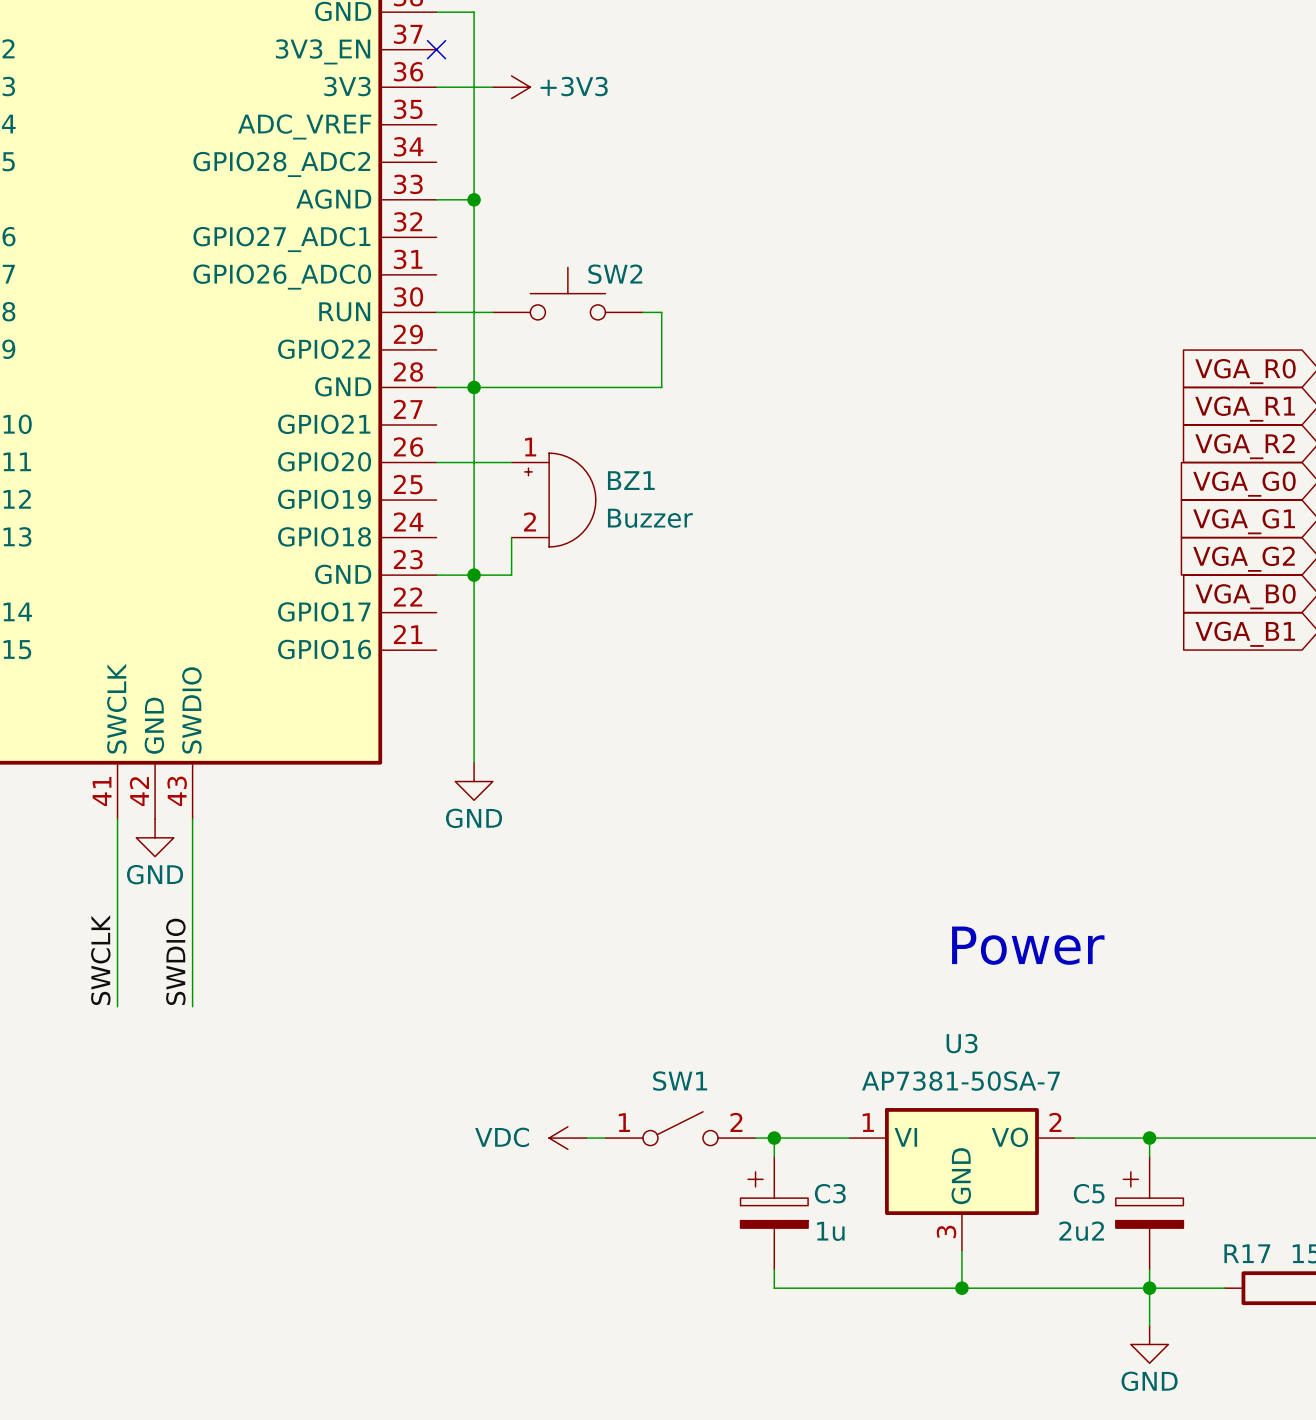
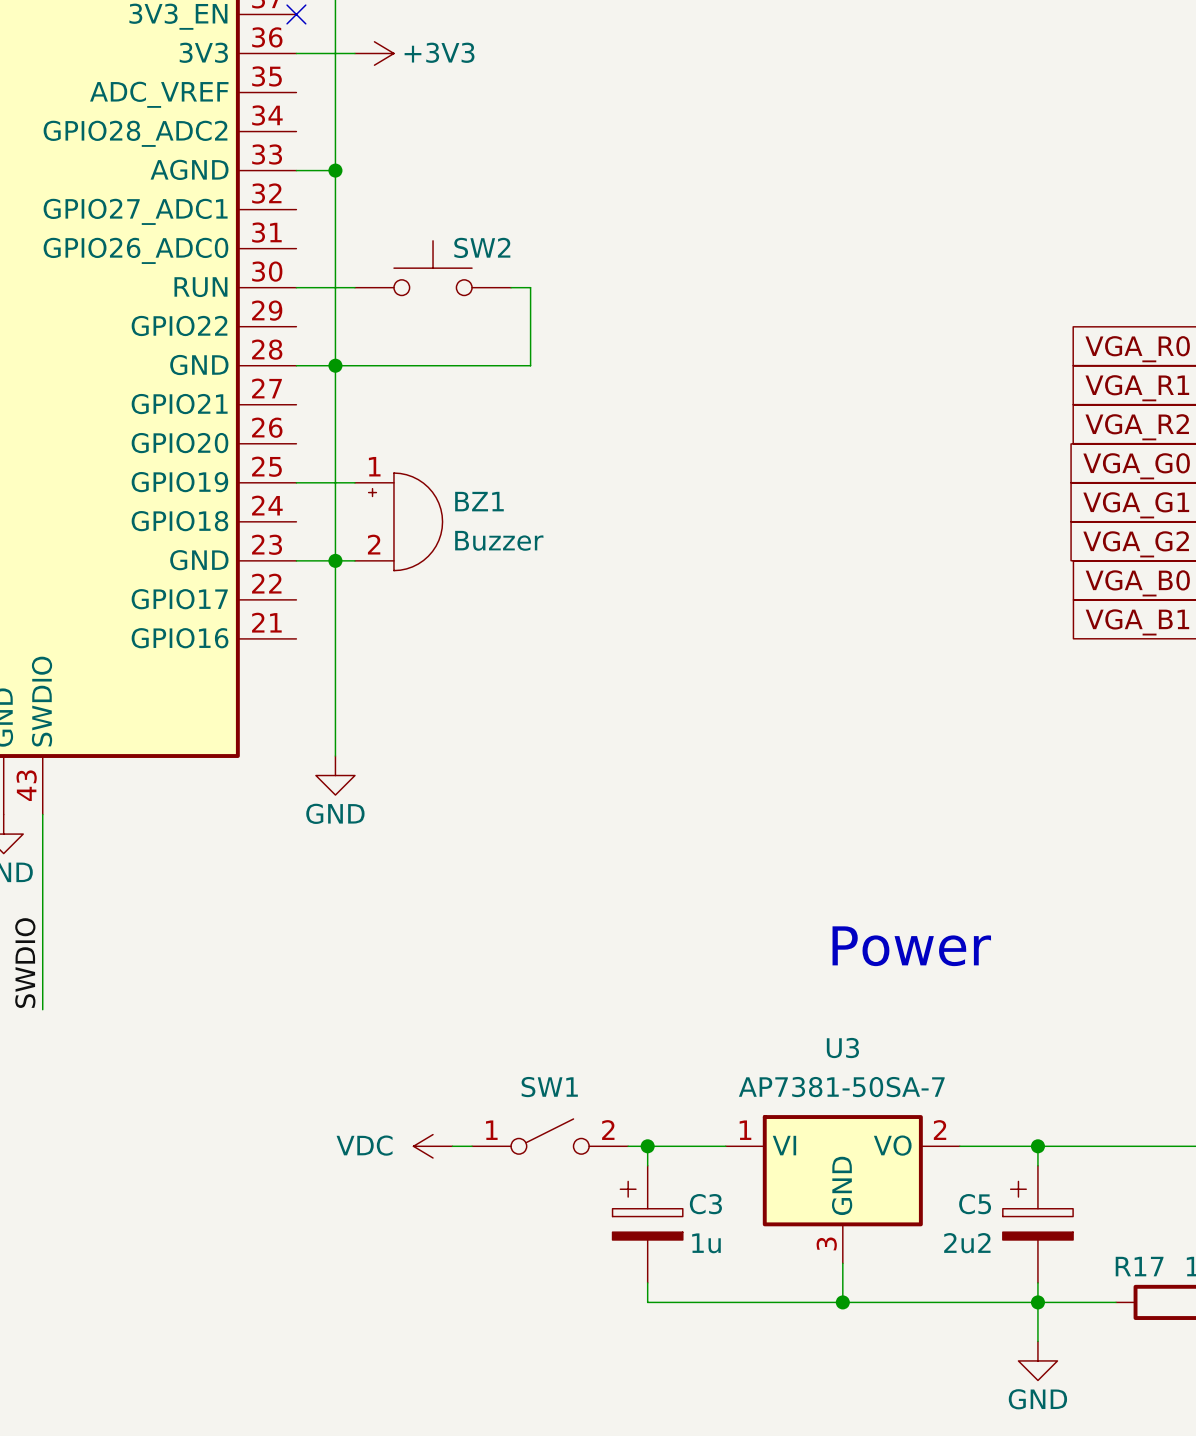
wire: (436, 462) (511, 462) -> none
wire: none -> (296, 482) (354, 482)
BZ1 position: (553, 500) -> (398, 521)
wire: (511, 537) (511, 575) (492, 575) -> none

